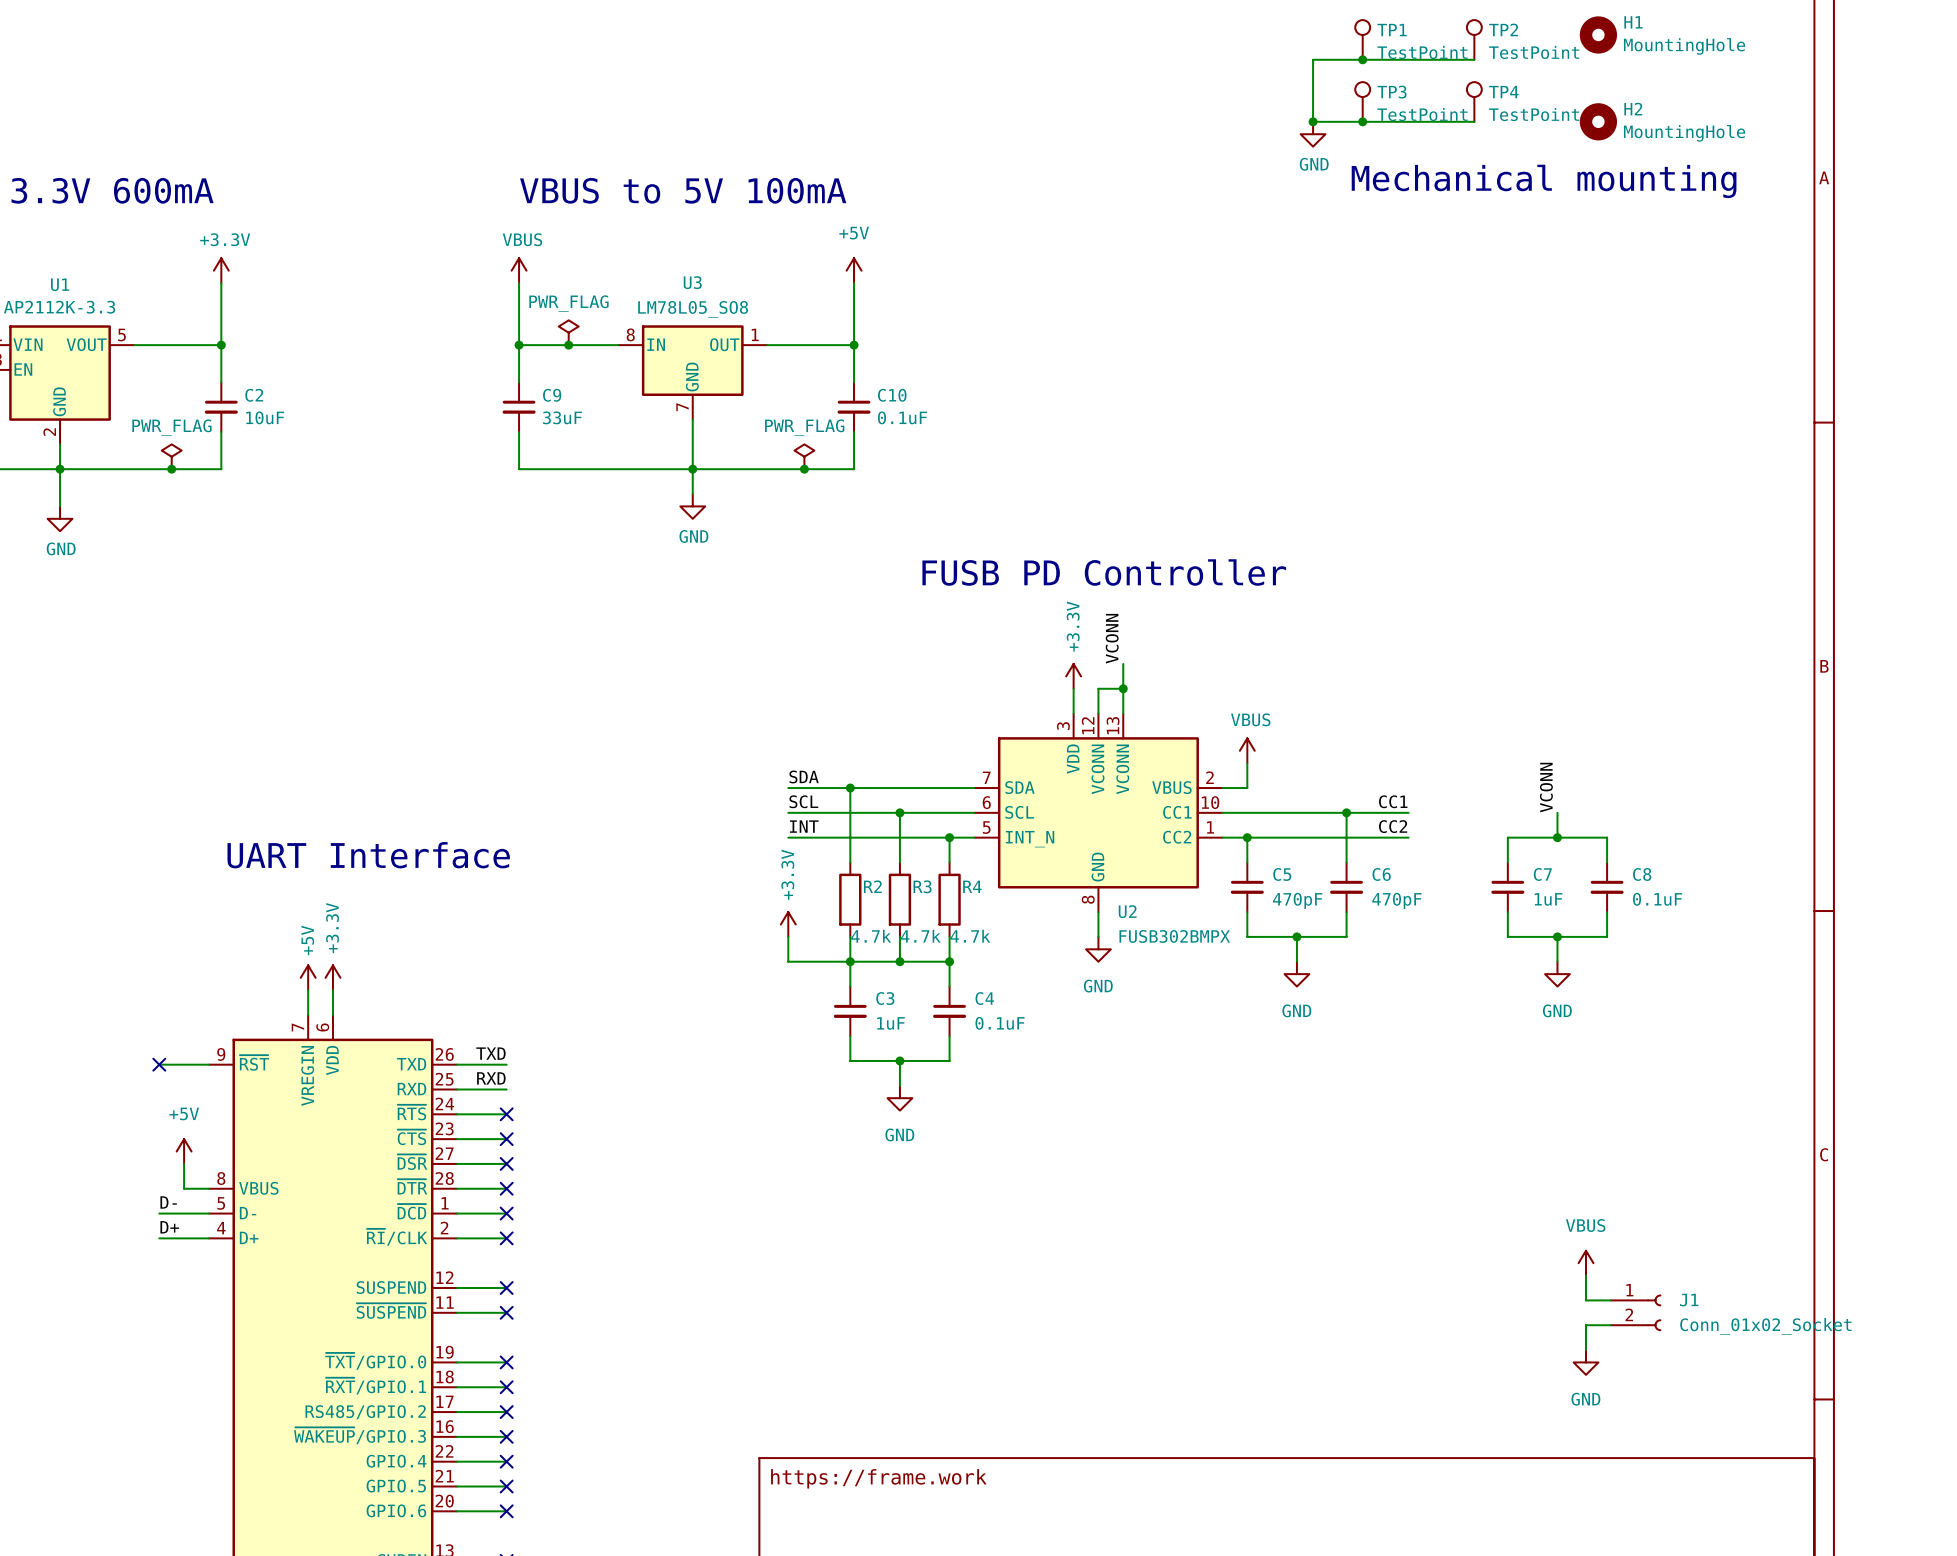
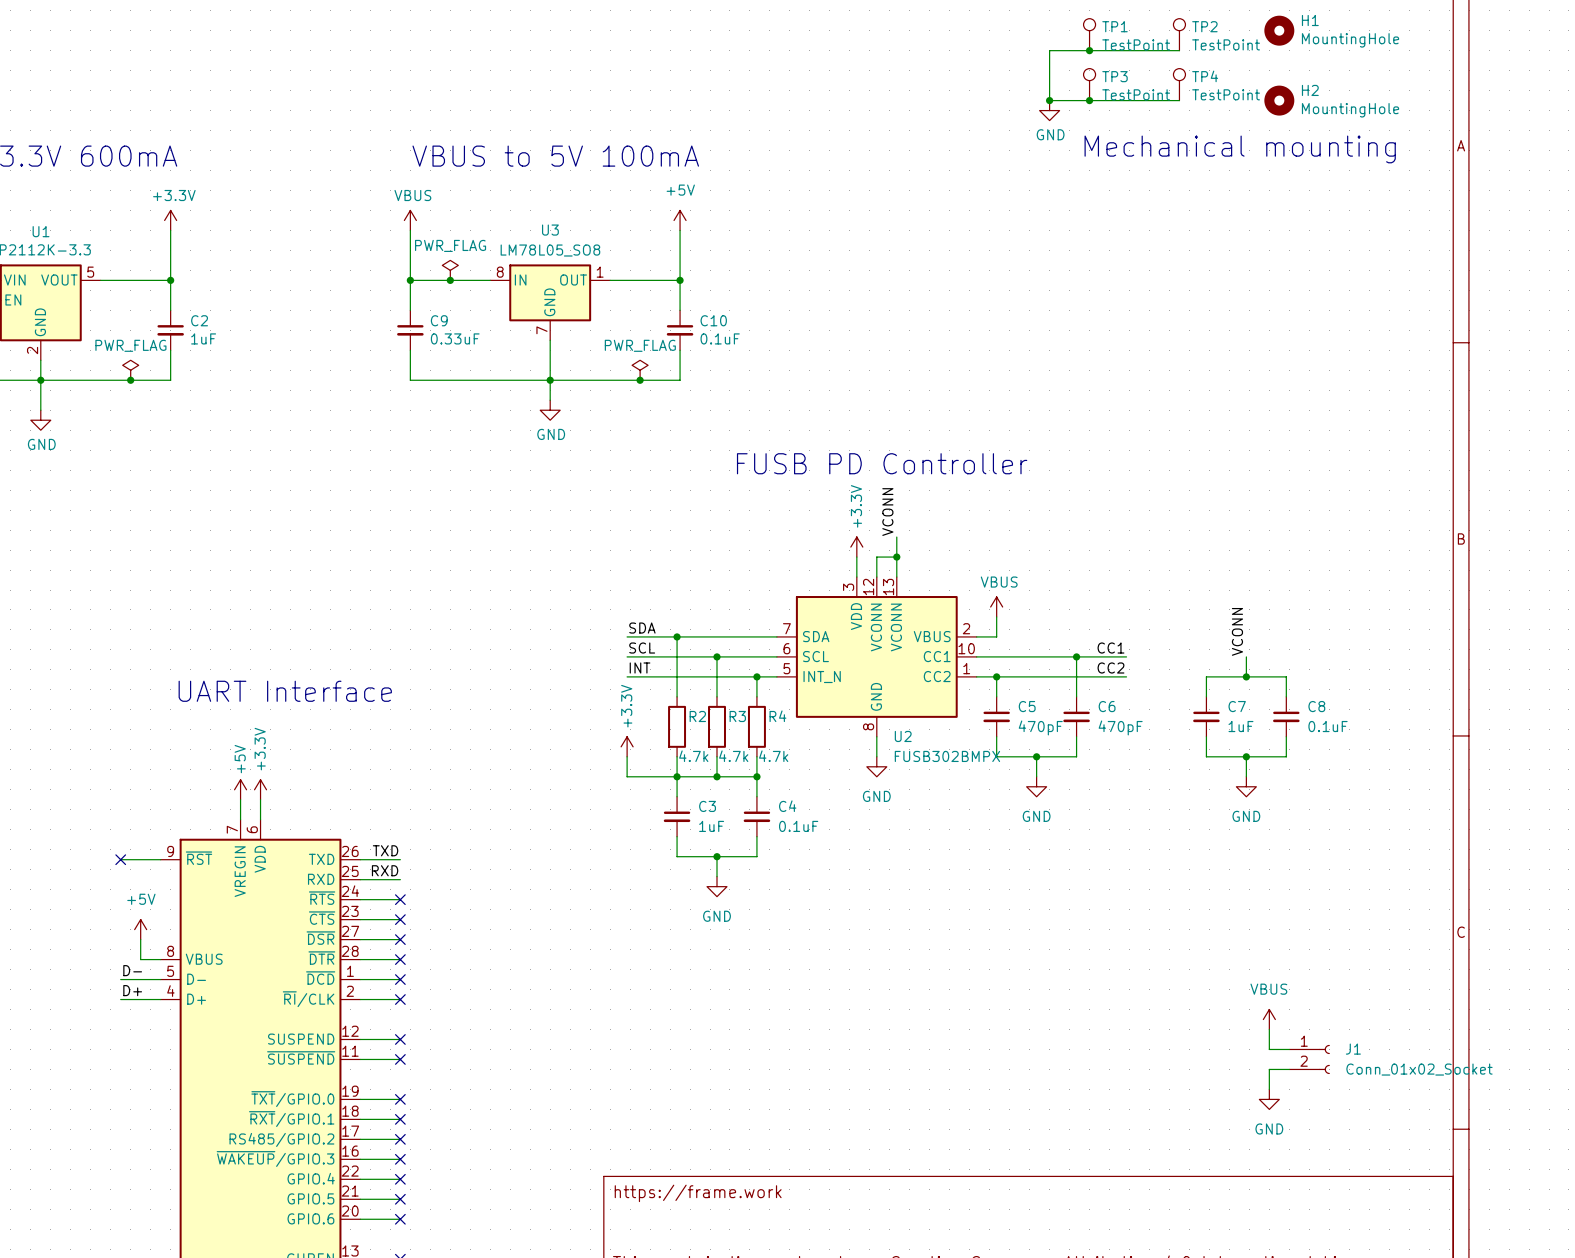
C2 value: 10uF (265, 417) -> 1uF (203, 338)
C9 value: 33uF (562, 417) -> 0.33uF (455, 338)

